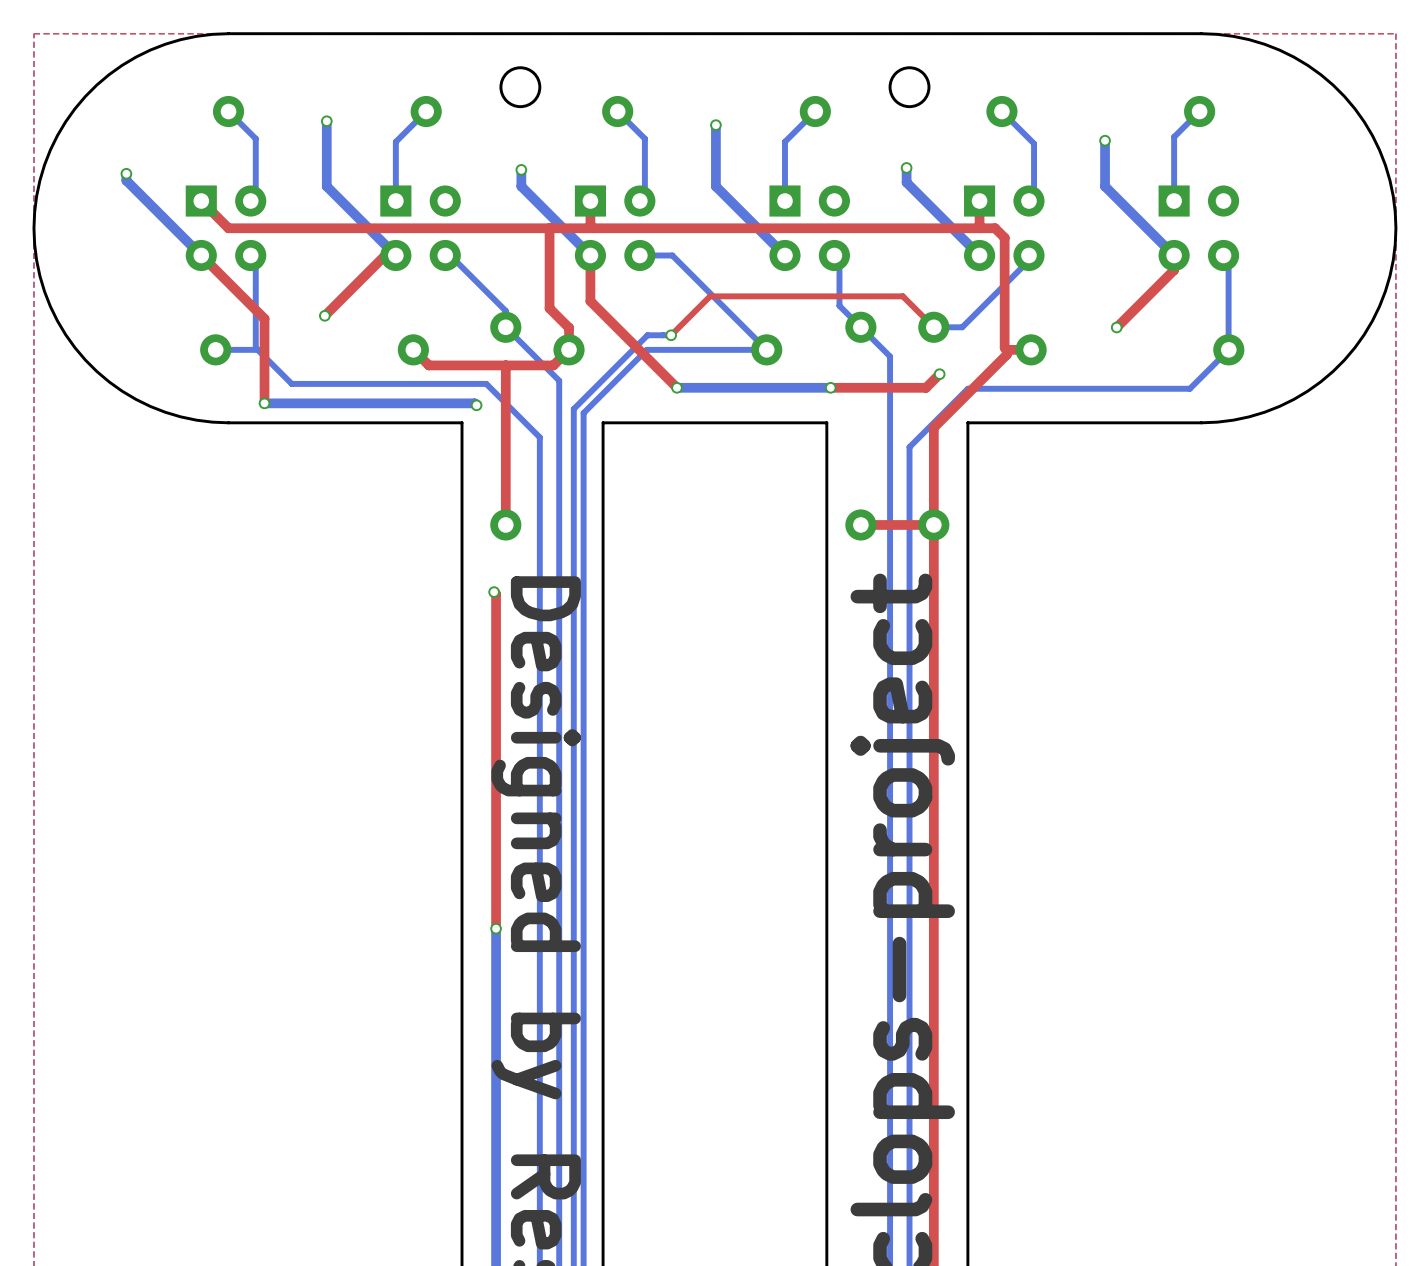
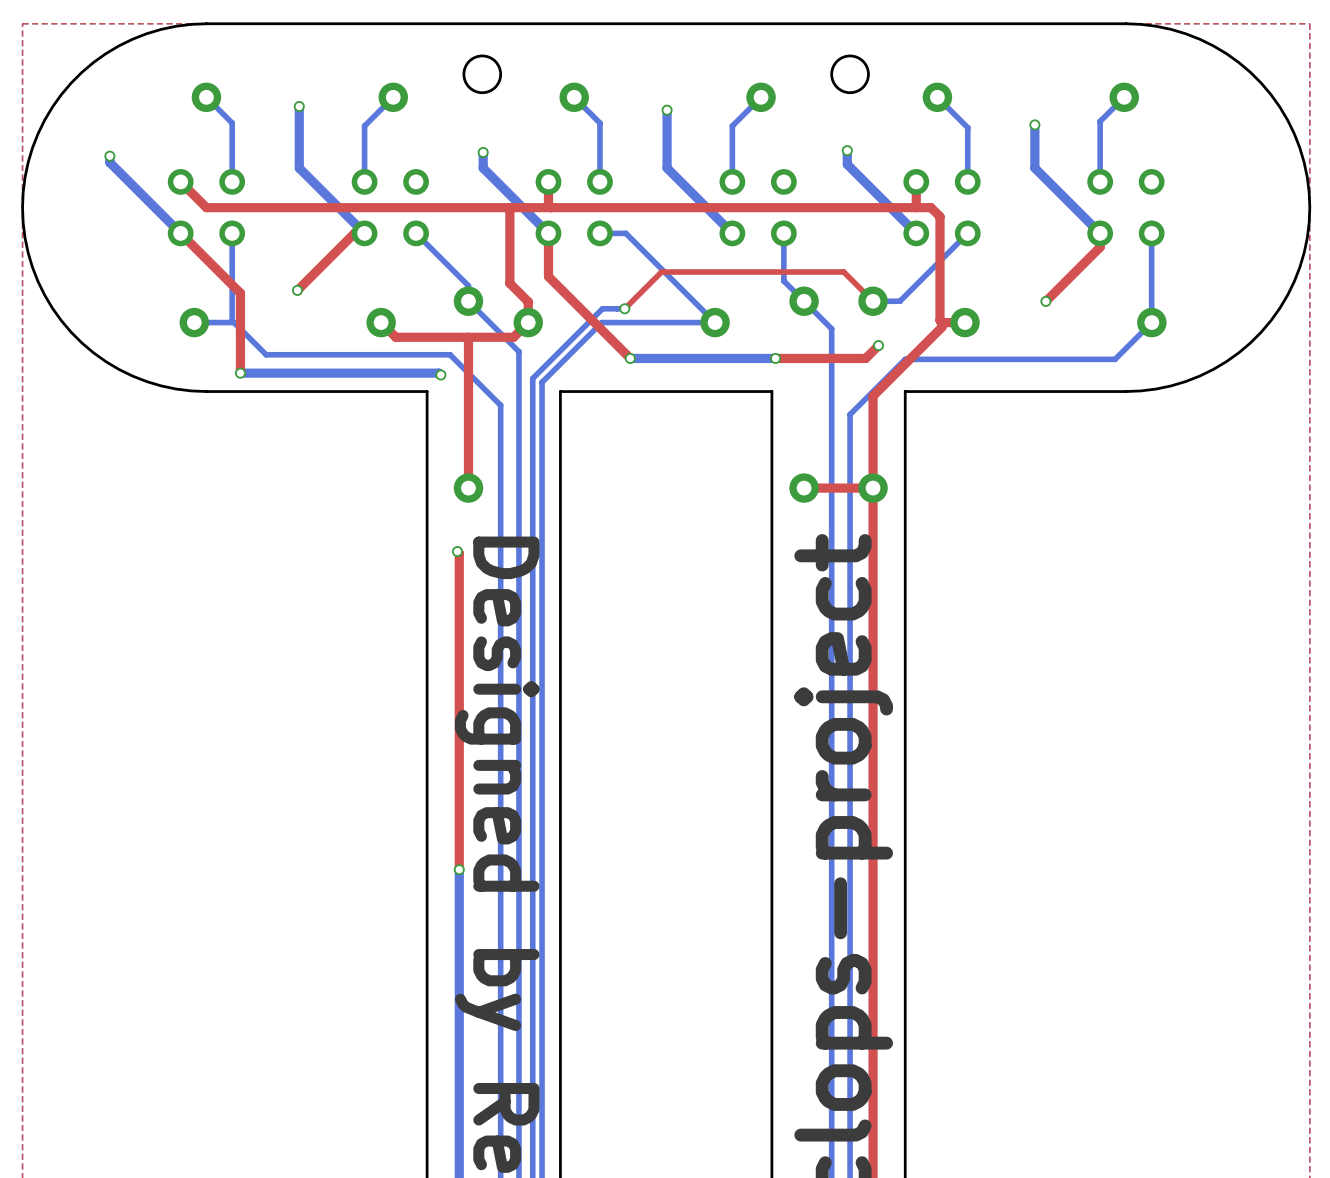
part footprint: [185, 185, 267, 272] -> [167, 169, 246, 247]
part footprint: [380, 185, 461, 272] -> [351, 169, 429, 247]
part footprint: [574, 185, 656, 272] -> [535, 169, 613, 247]
part footprint: [769, 185, 850, 272] -> [719, 169, 797, 247]
part footprint: [963, 185, 1045, 272] -> [903, 169, 981, 247]
part footprint: [1158, 185, 1240, 272] -> [1087, 169, 1165, 247]

